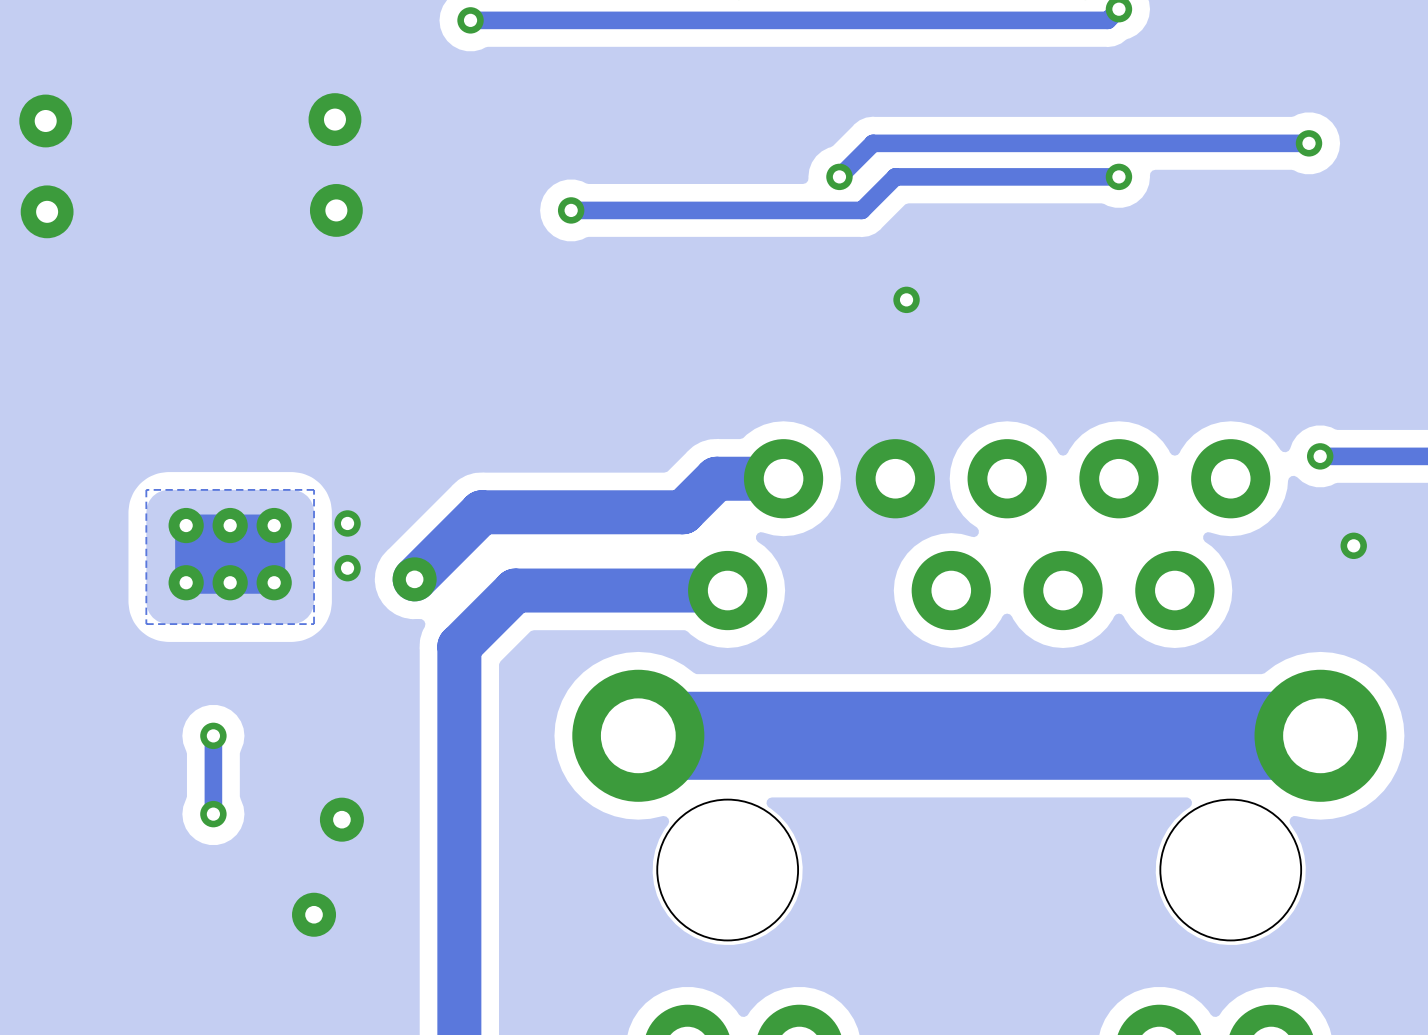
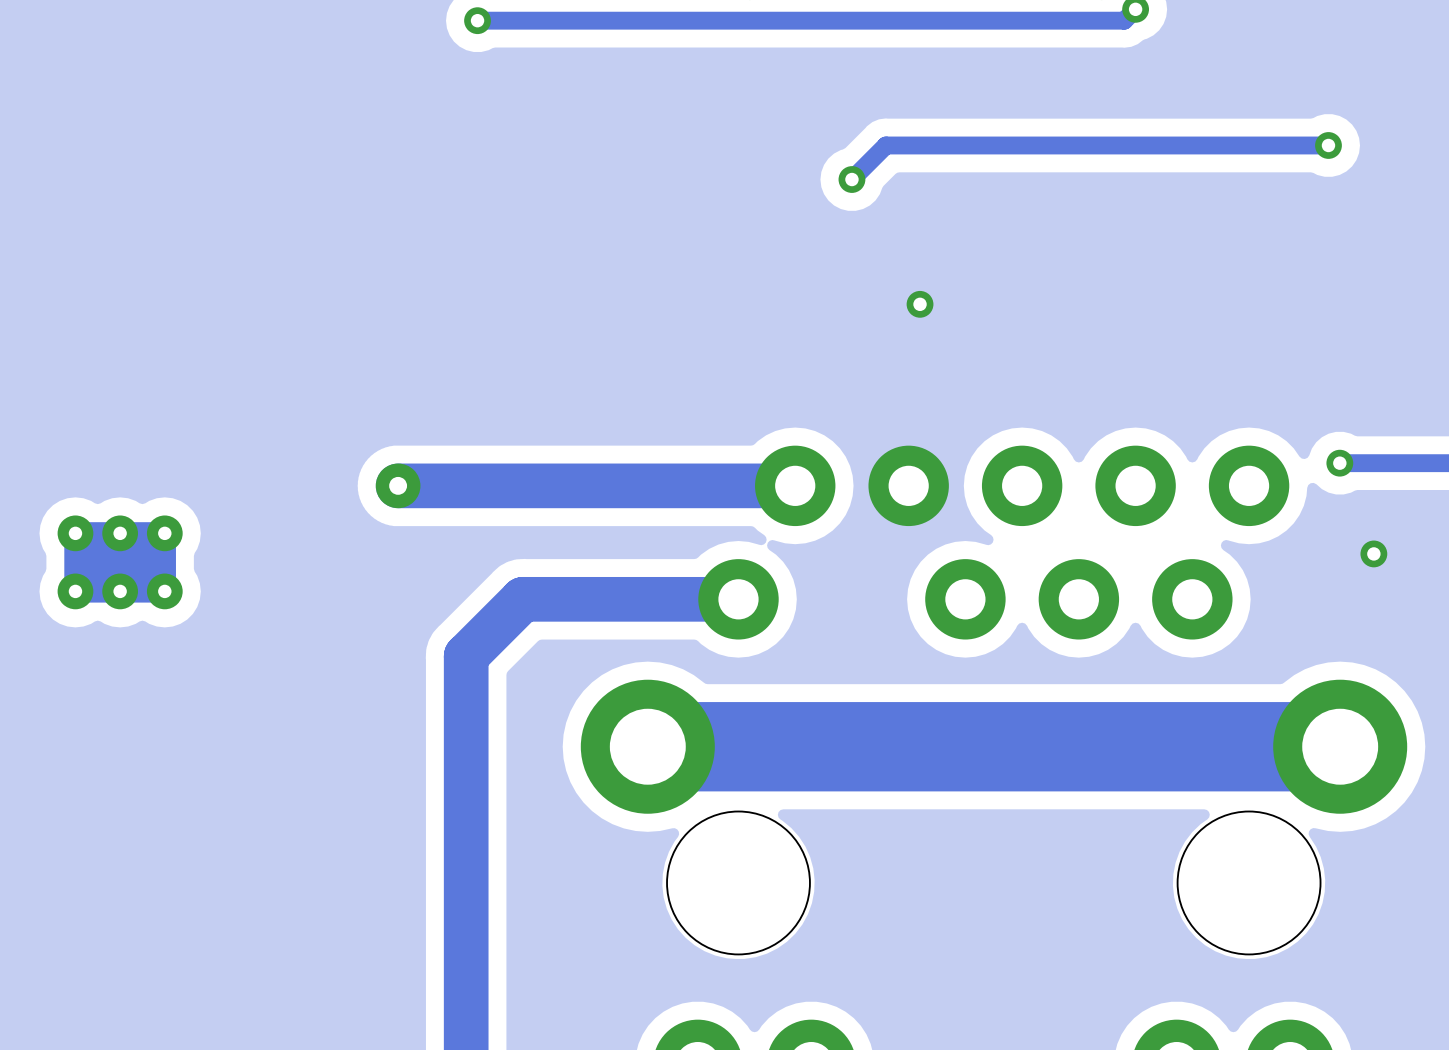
via: (334, 119) -> none
via: (45, 120) -> none
track: (1118, 176) (895, 176) (861, 210) (571, 210) -> none
via: (1118, 176) -> none
via: (336, 210) -> none
via: (571, 210) -> none
via: (47, 211) -> none
track: (716, 478) (682, 512) (481, 512) (414, 579) -> (727, 485) (398, 485)
zone outline: (314, 489) (146, 489) (146, 624) (314, 624) (314, 489) -> none
via: (347, 523) -> none
part position: (230, 554) -> (120, 562)
via: (347, 568) -> none
via position: (414, 579) -> (398, 485)
track: (213, 735) (213, 814) -> none
via: (213, 735) -> none
via: (213, 814) -> none
via: (341, 819) -> none
via: (314, 914) -> none

